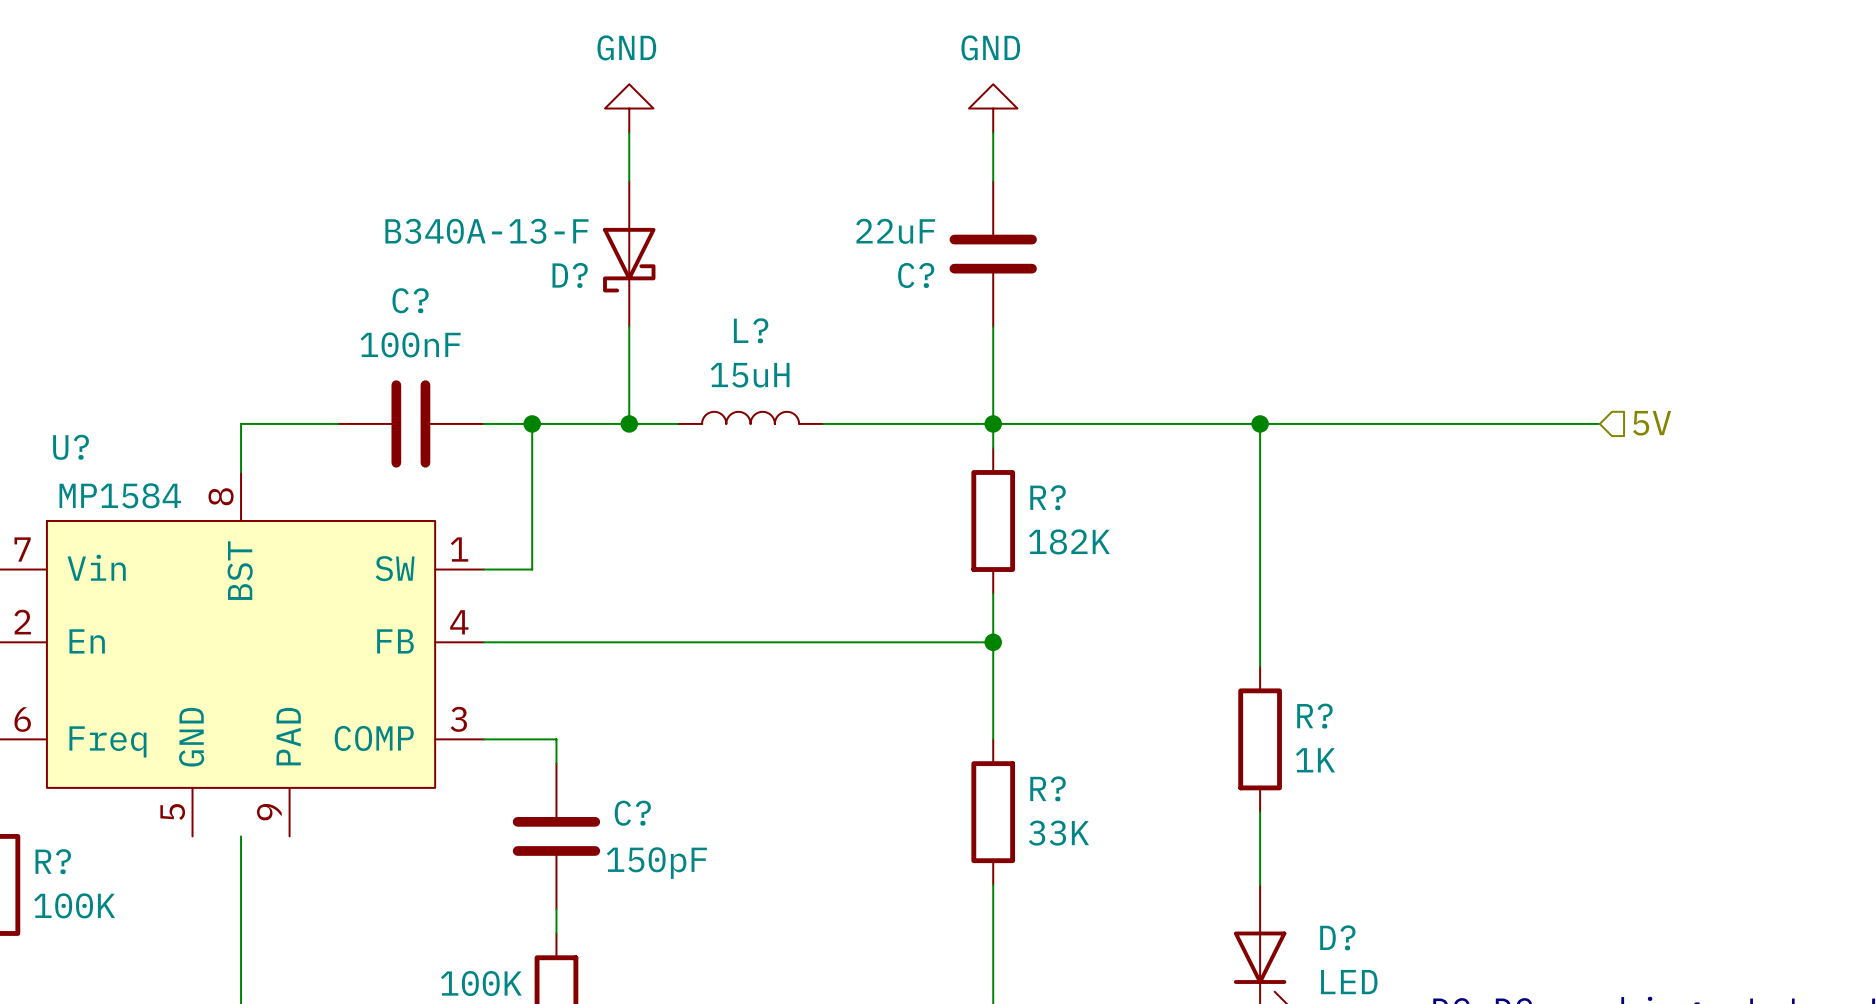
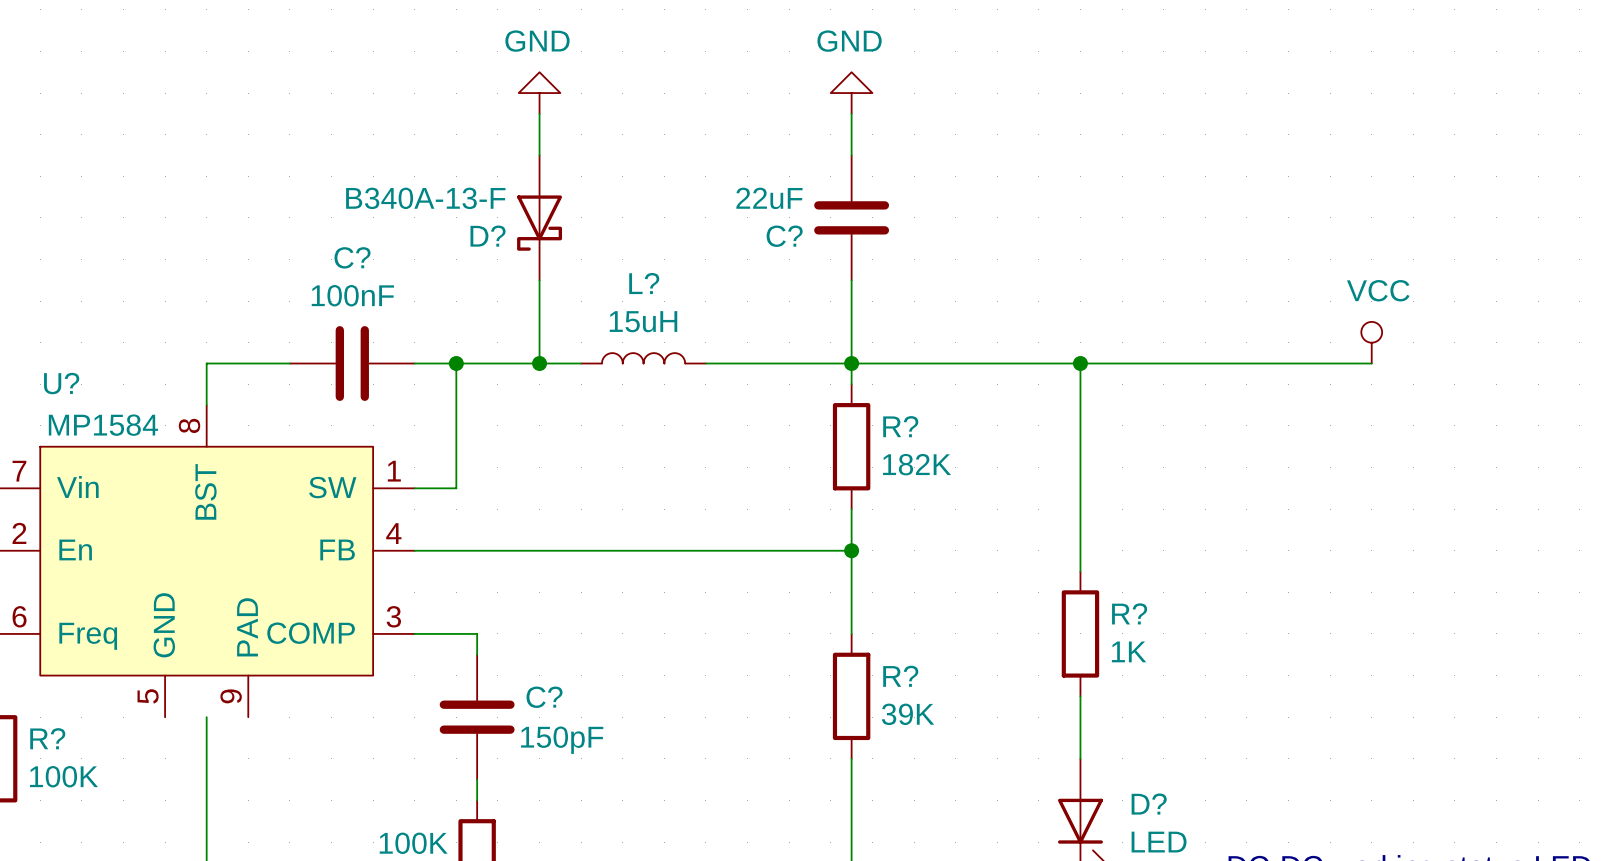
power symbol: none -> VCC (1371, 342)
hierarchical label: 5V (1652, 423) -> none
R? value: 33K (1058, 833) -> 39K (908, 714)

